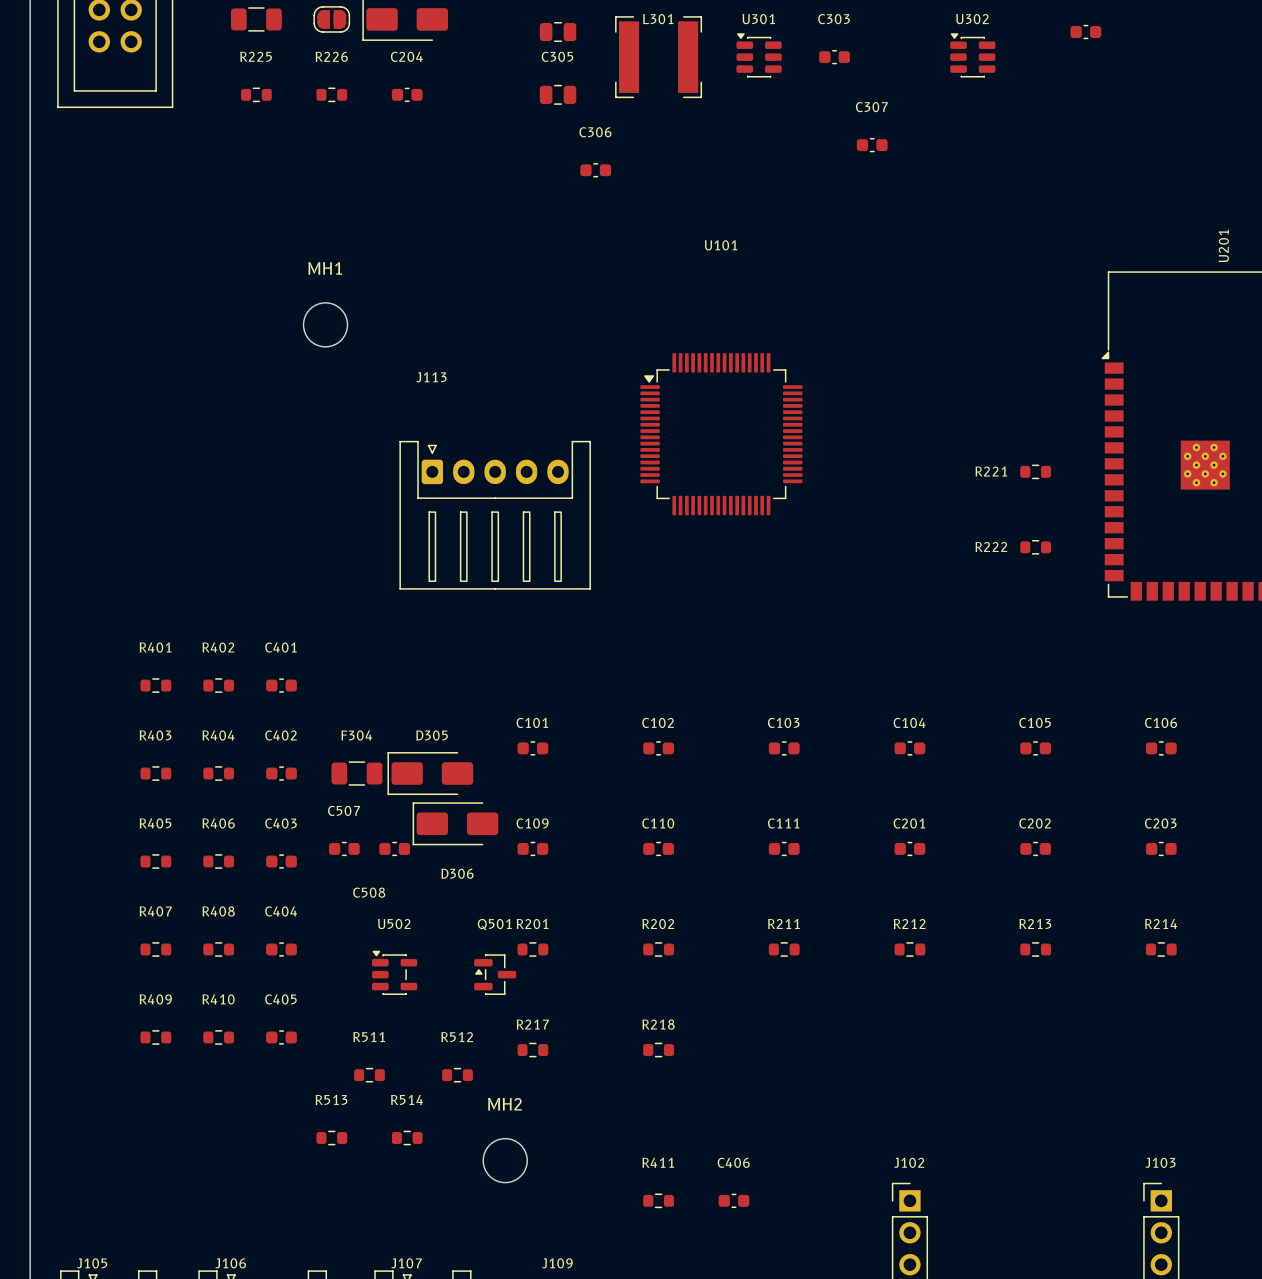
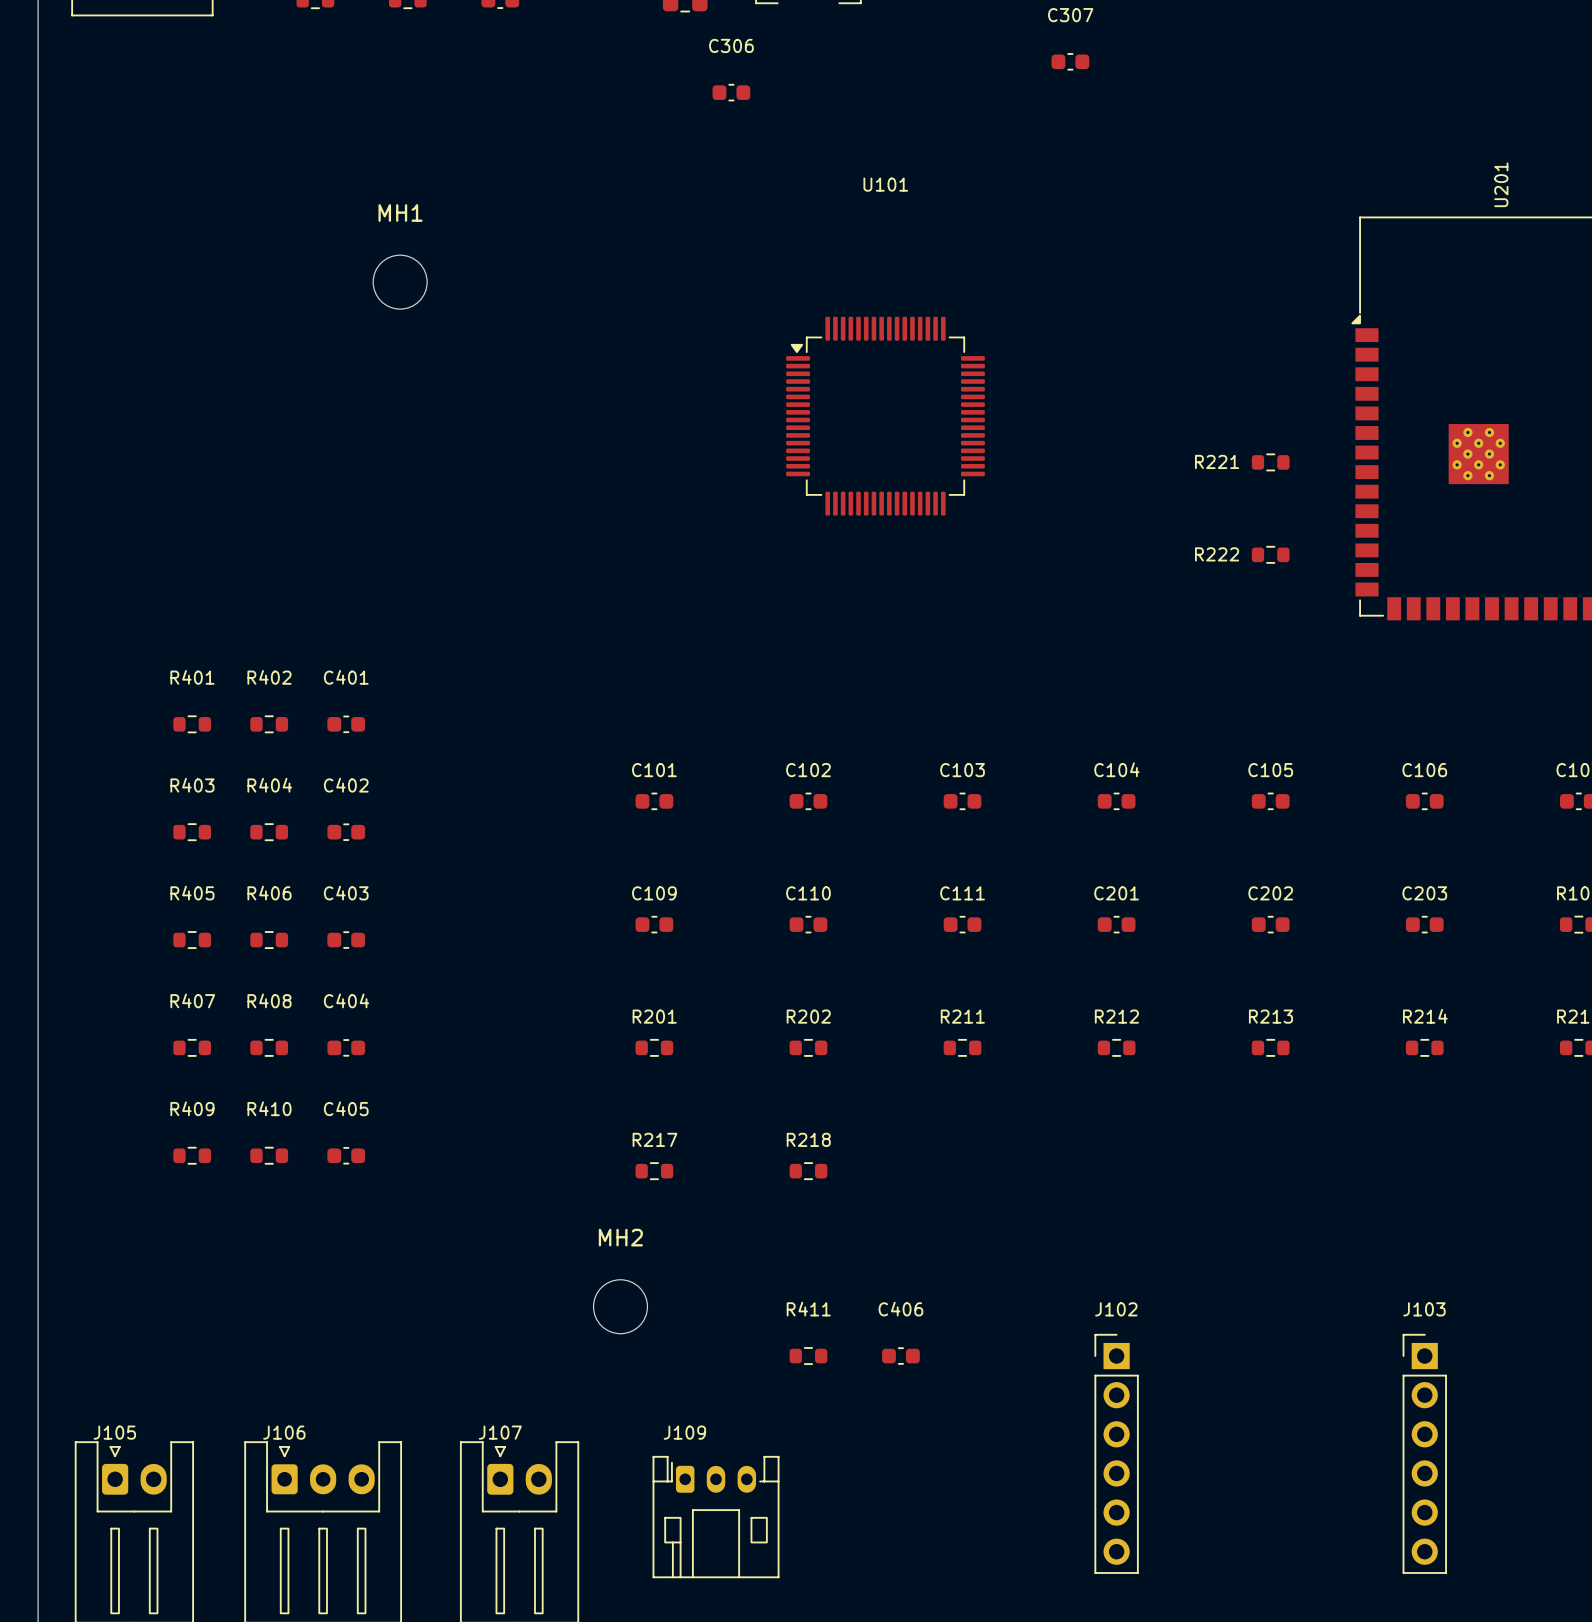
J113: (495, 515) -> none
F304: (356, 773) -> none
D305: (430, 773) -> none
D306: (455, 823) -> none
C507: (344, 848) -> none
C508: (394, 848) -> none
U502: (394, 972) -> none
Q501: (495, 974) -> none
R511: (369, 1075) -> none
R512: (457, 1075) -> none
R513: (331, 1138) -> none
R514: (407, 1138) -> none

